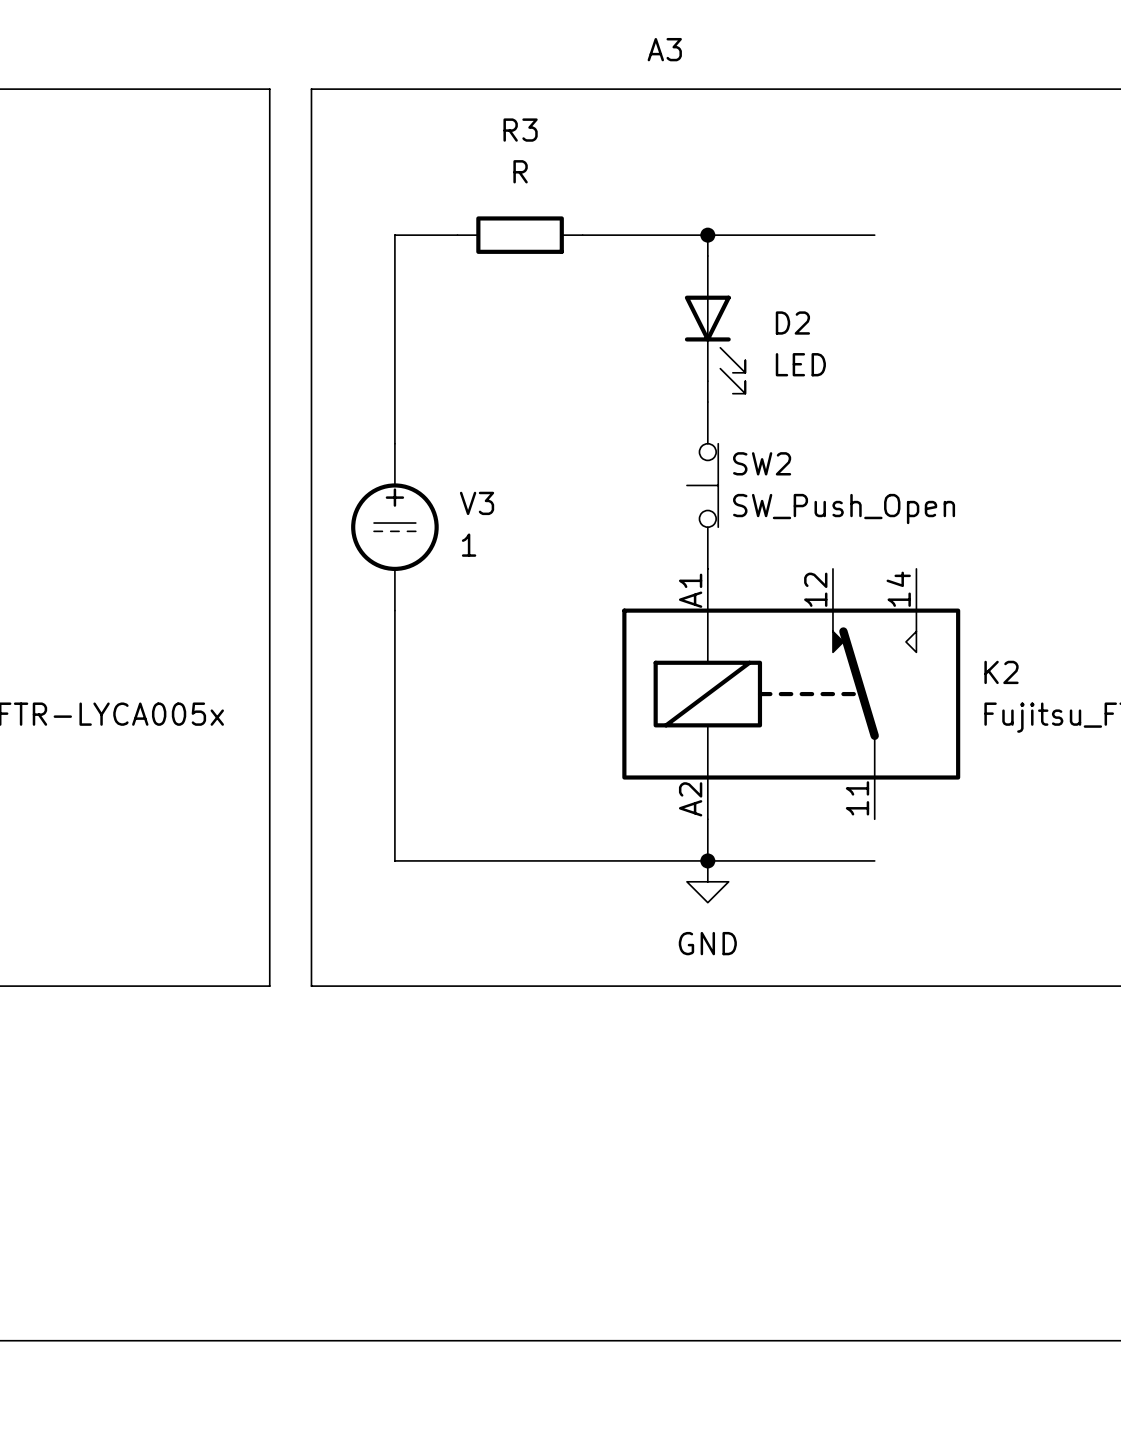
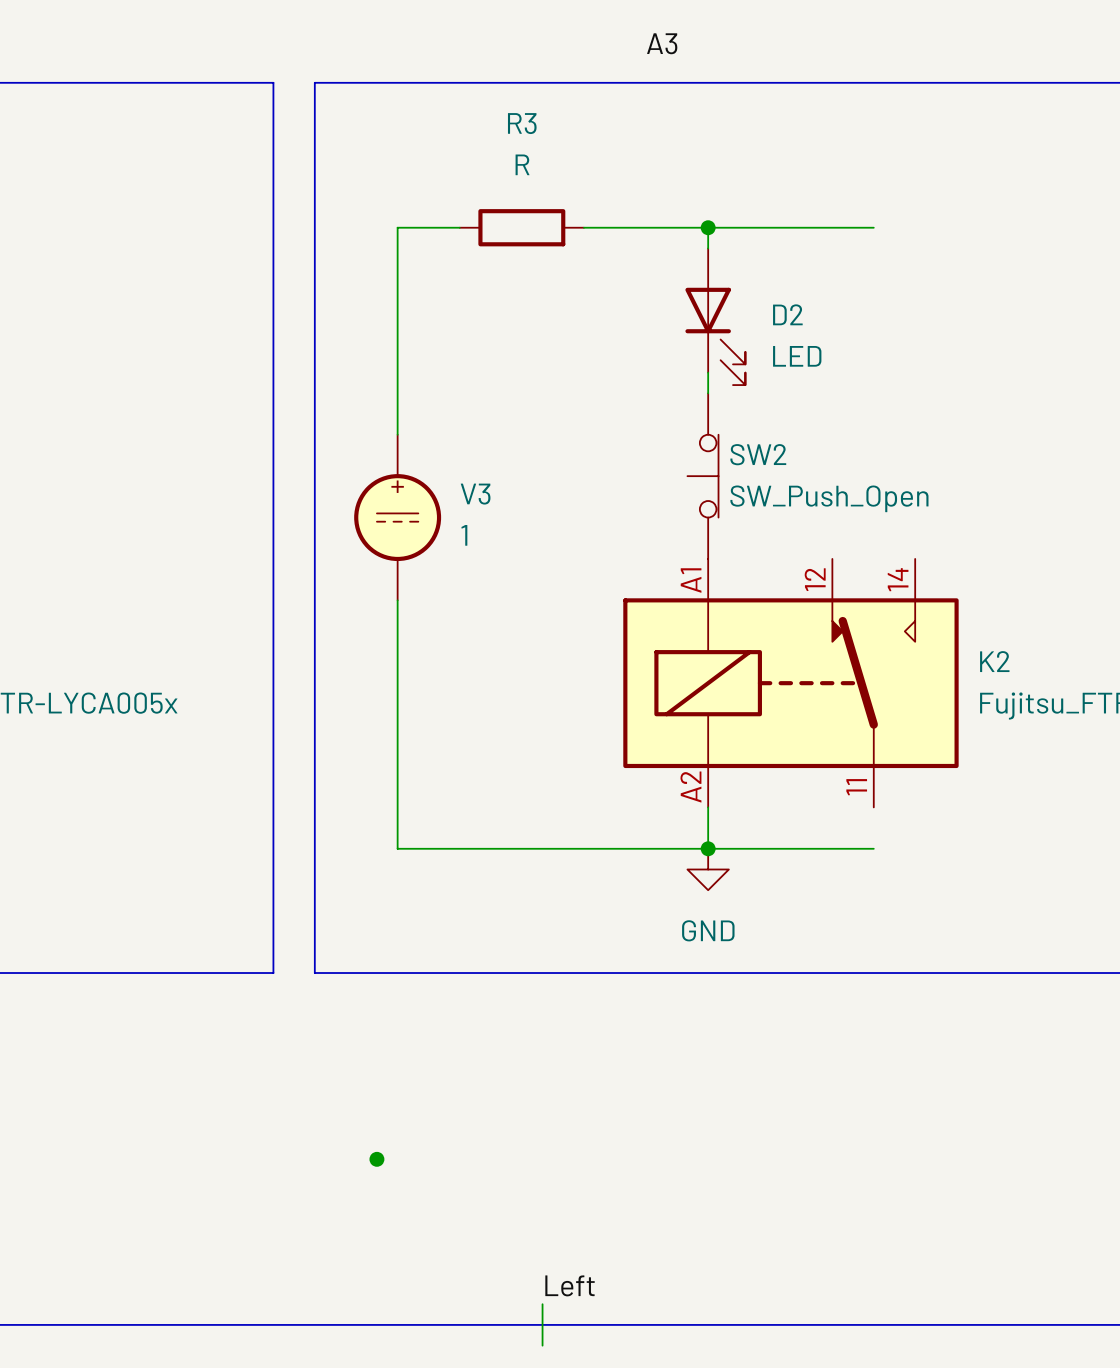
junction: none -> (376, 1159)
label: none -> Left (570, 1285)
wire: none -> (542, 1304) (542, 1345)

